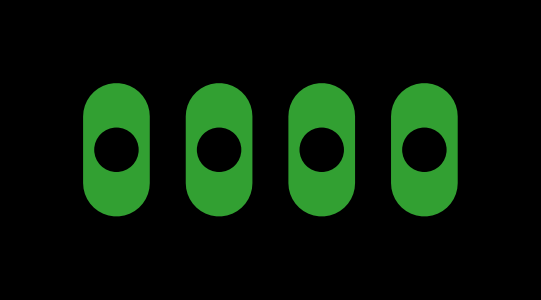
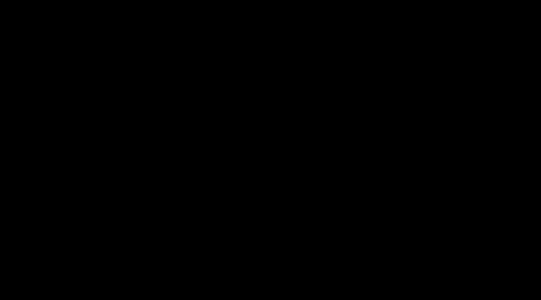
part: (270, 149) -> none

